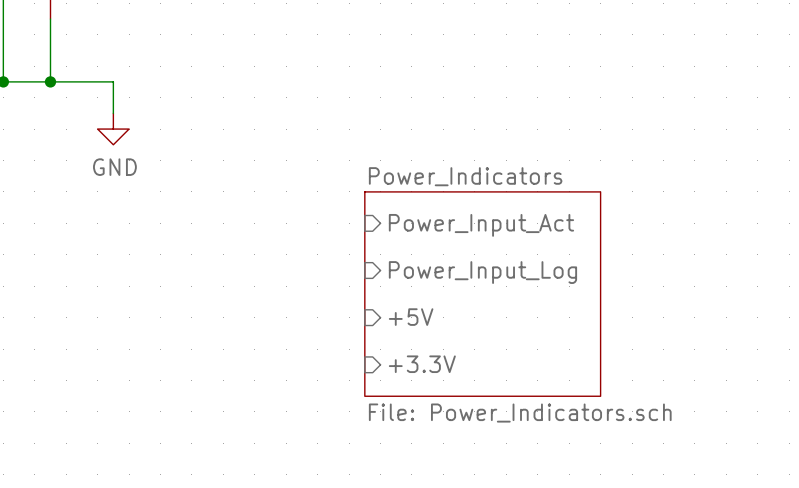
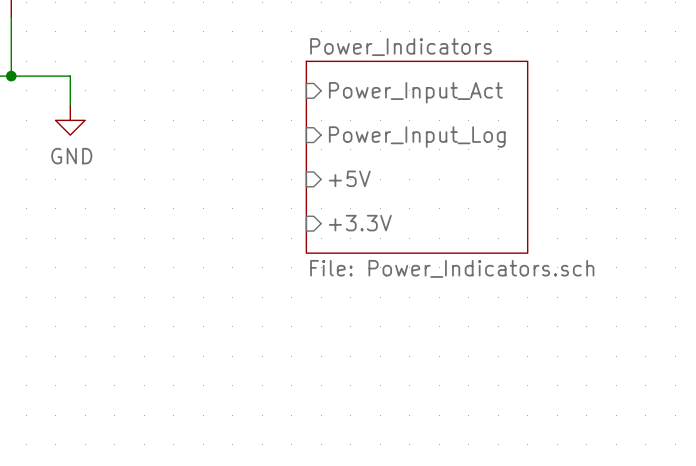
sheet pin position: Power_Input_Act (481, 225) -> Power_Input_Act (415, 92)
sheet pin position: Power_Input_Log (482, 272) -> Power_Input_Log (417, 137)
sheet Power_Indicators position: (482, 294) -> (417, 157)
sheet pin position: +5V (411, 317) -> +5V (349, 178)
sheet pin position: +3.3V (422, 364) -> +3.3V (360, 223)

